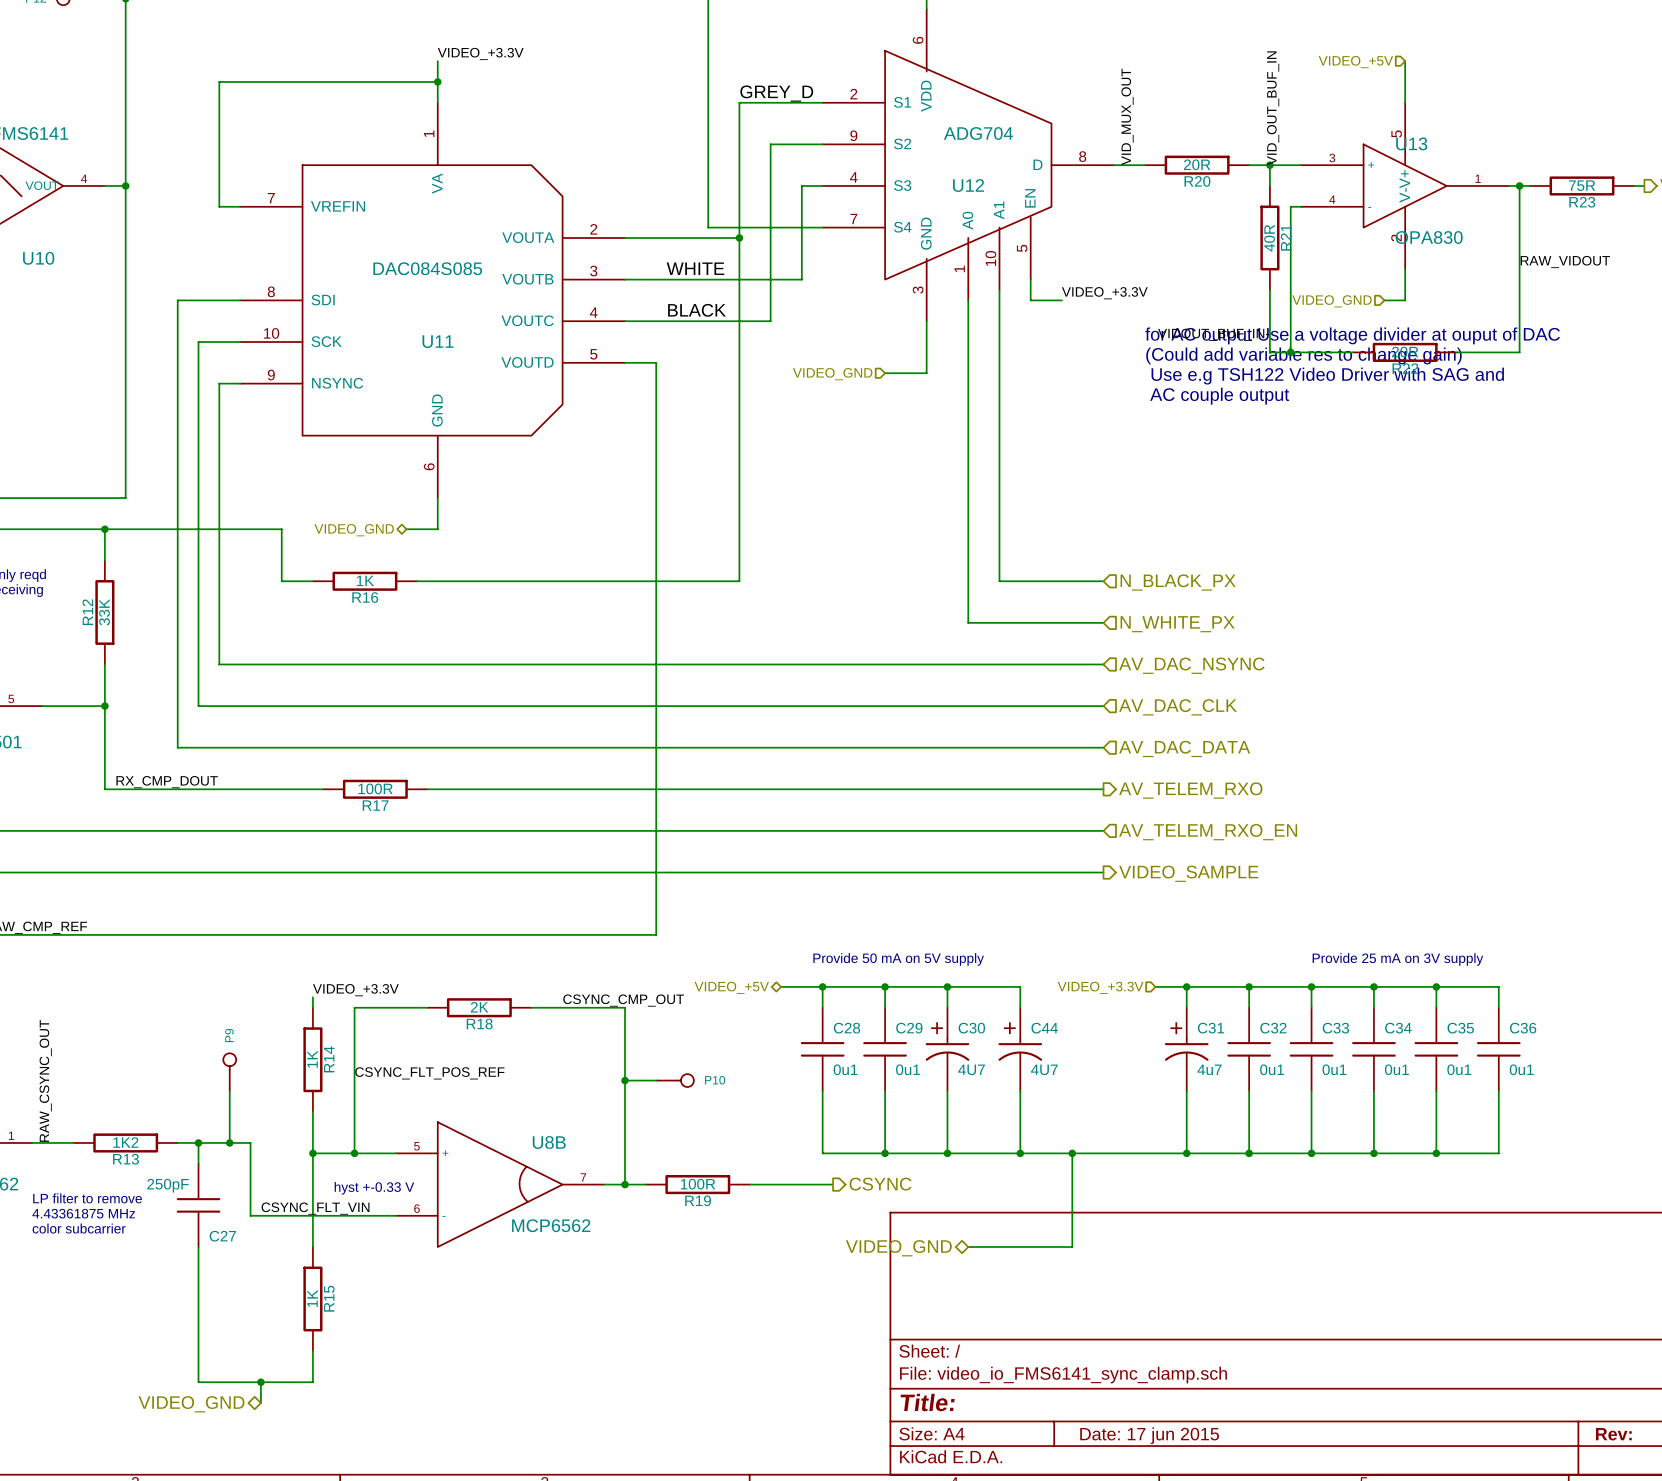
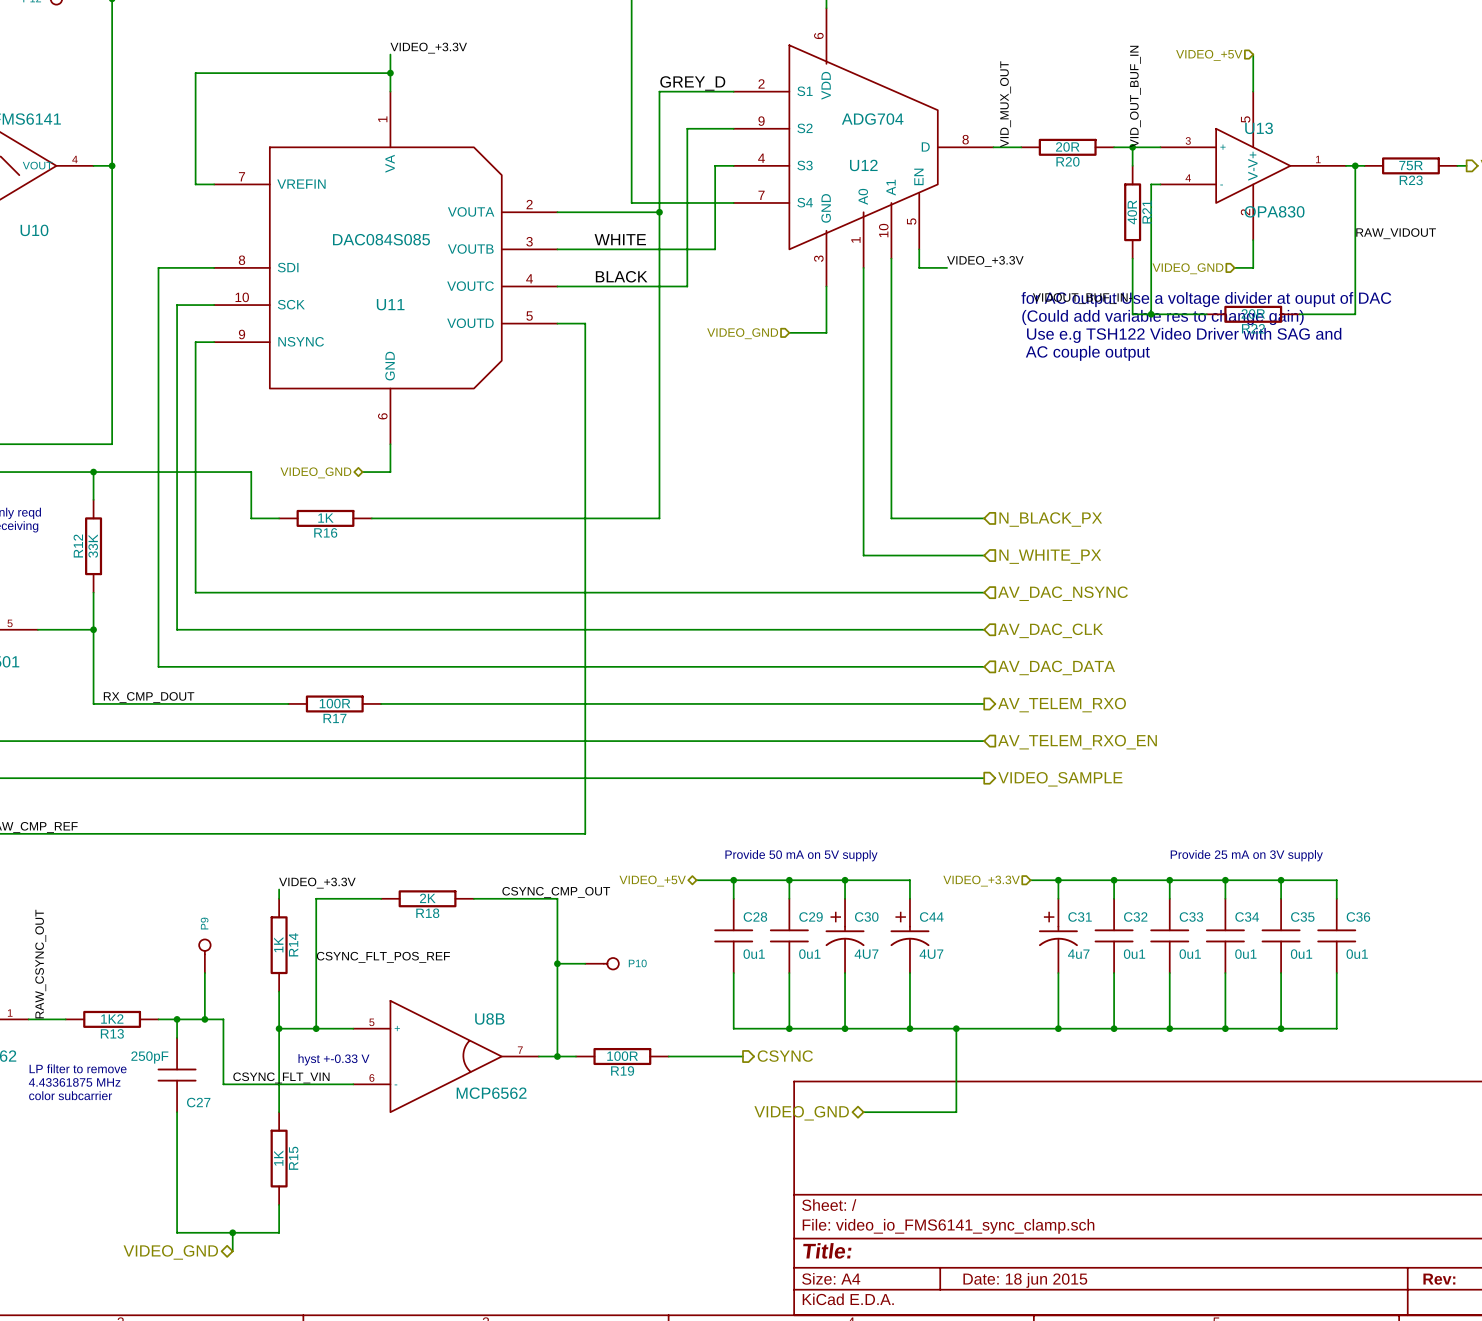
title block: Date: 17 jun 2015 (1149, 1435) -> Date: 18 jun 2015 (1025, 1280)

